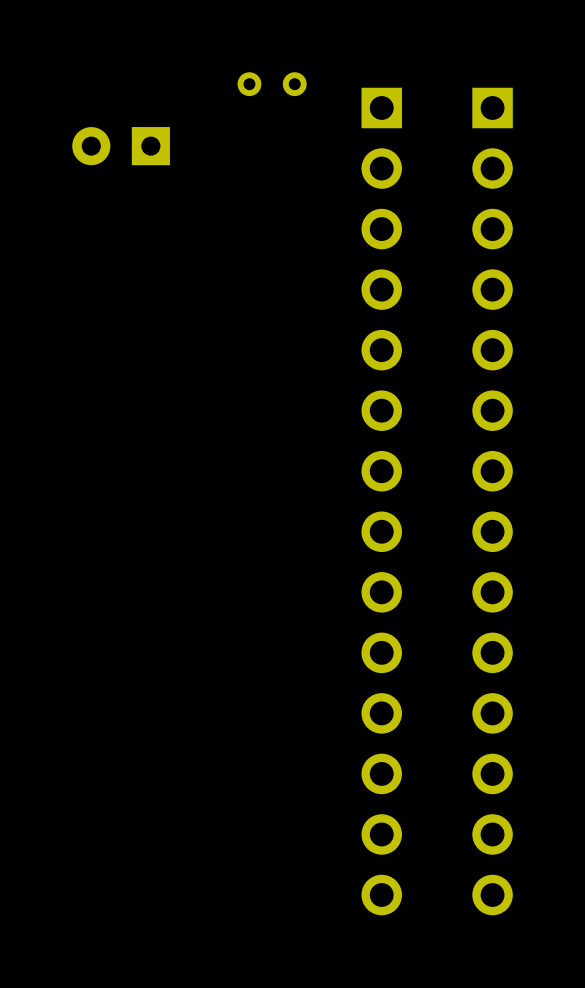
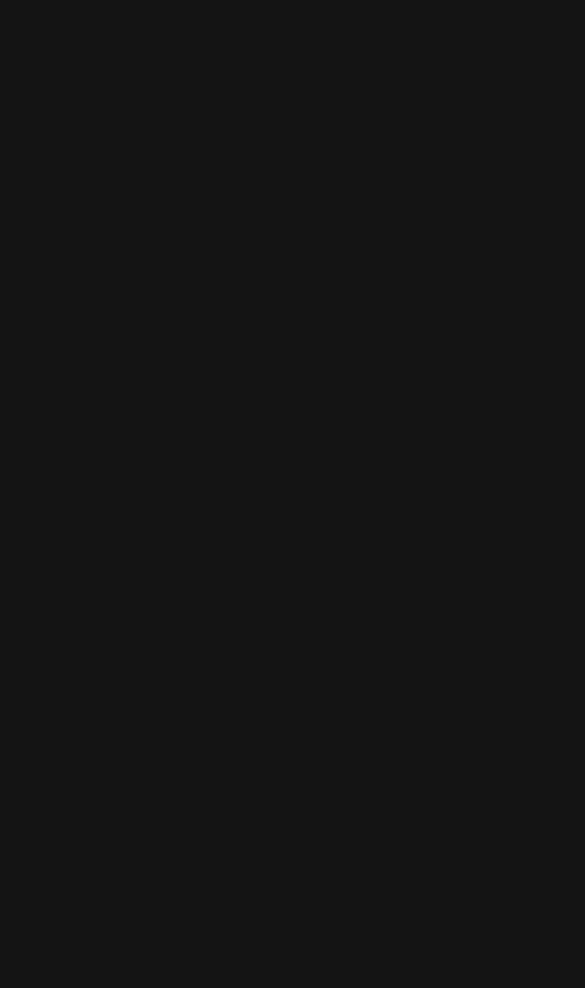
part: (272, 84) -> none
part: (121, 146) -> none
part: (381, 501) -> none
part: (492, 501) -> none

